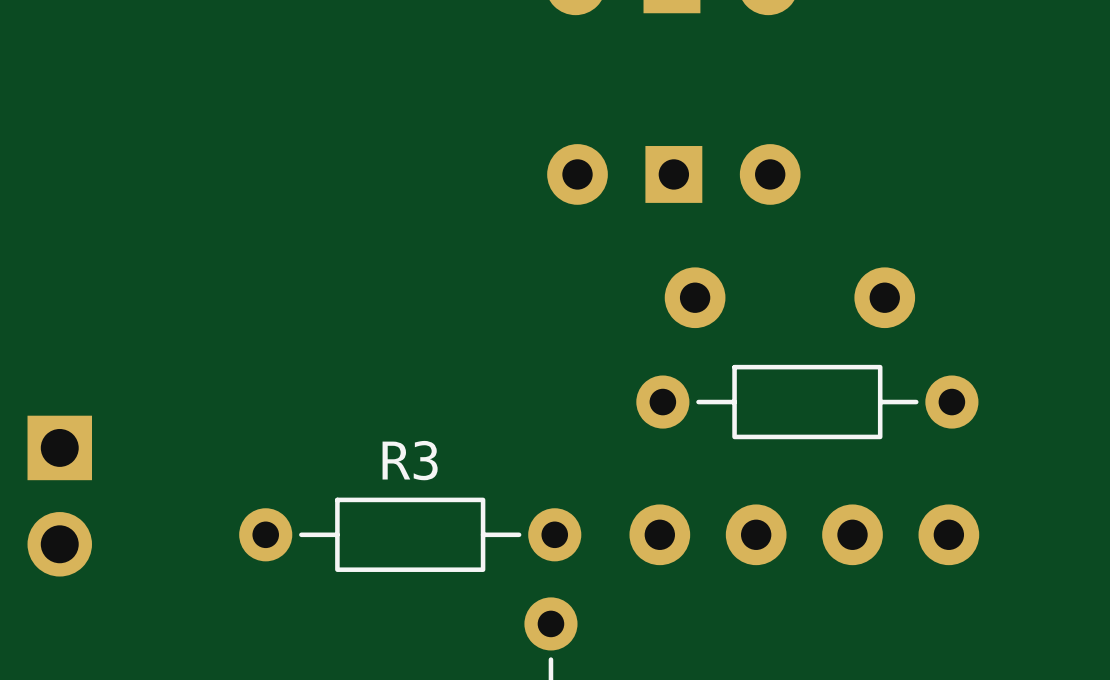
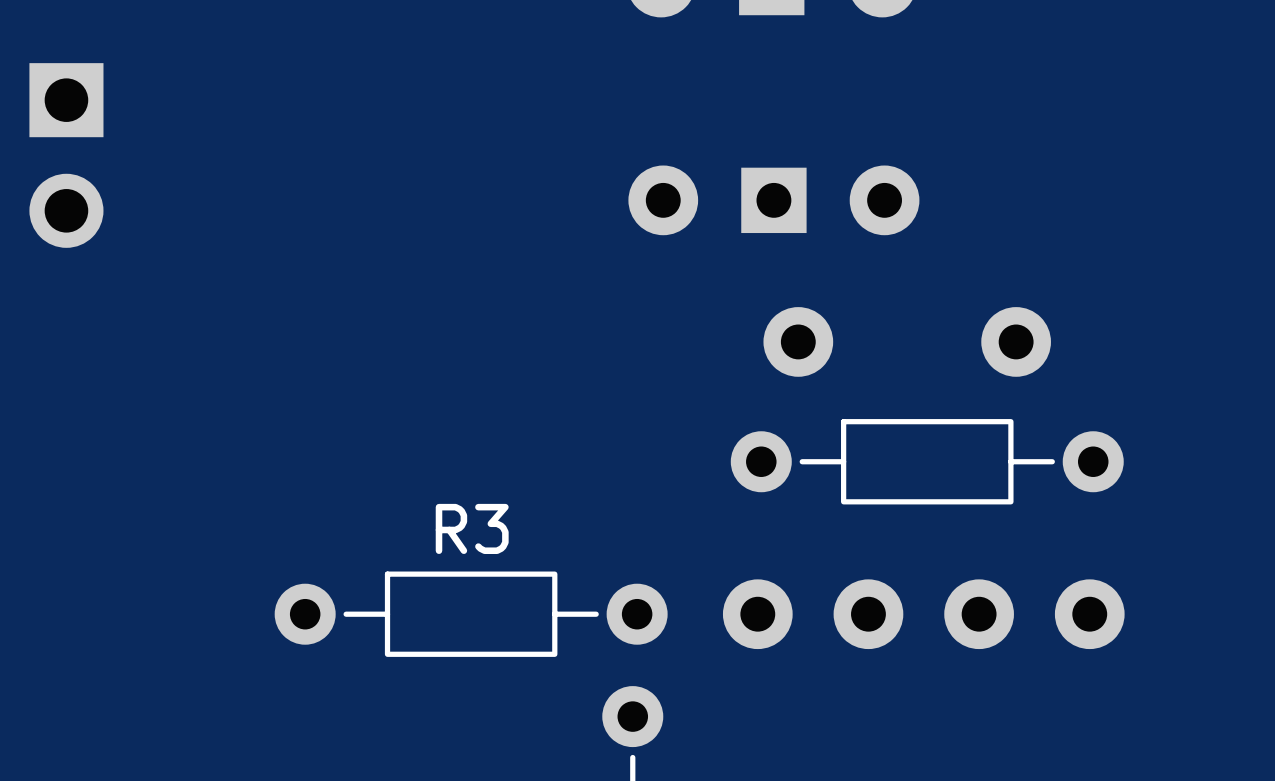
part position: (59, 496) -> (66, 155)

